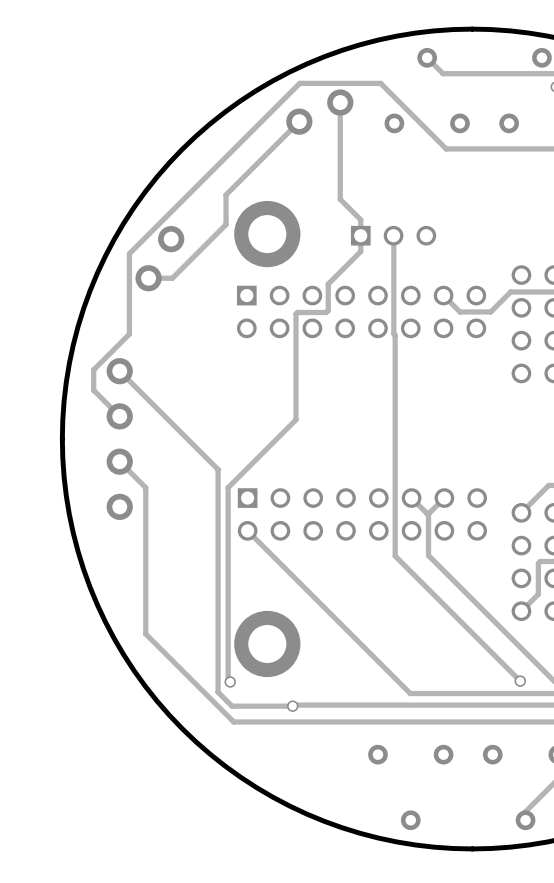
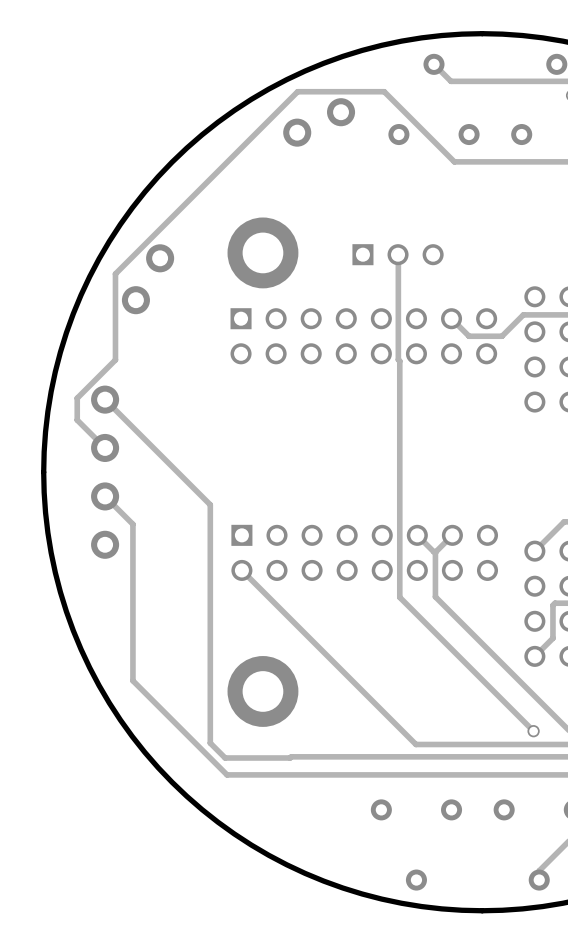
track: (340, 102) (340, 199) (360, 219) (360, 251) (328, 284) (328, 310) (326, 312) (296, 313) (296, 419) (228, 487) (228, 679) (230, 681) -> none
track: (299, 121) (226, 194) (226, 224) (172, 278) (148, 278) -> none
via: (230, 681) -> none
via: (292, 706) -> none

